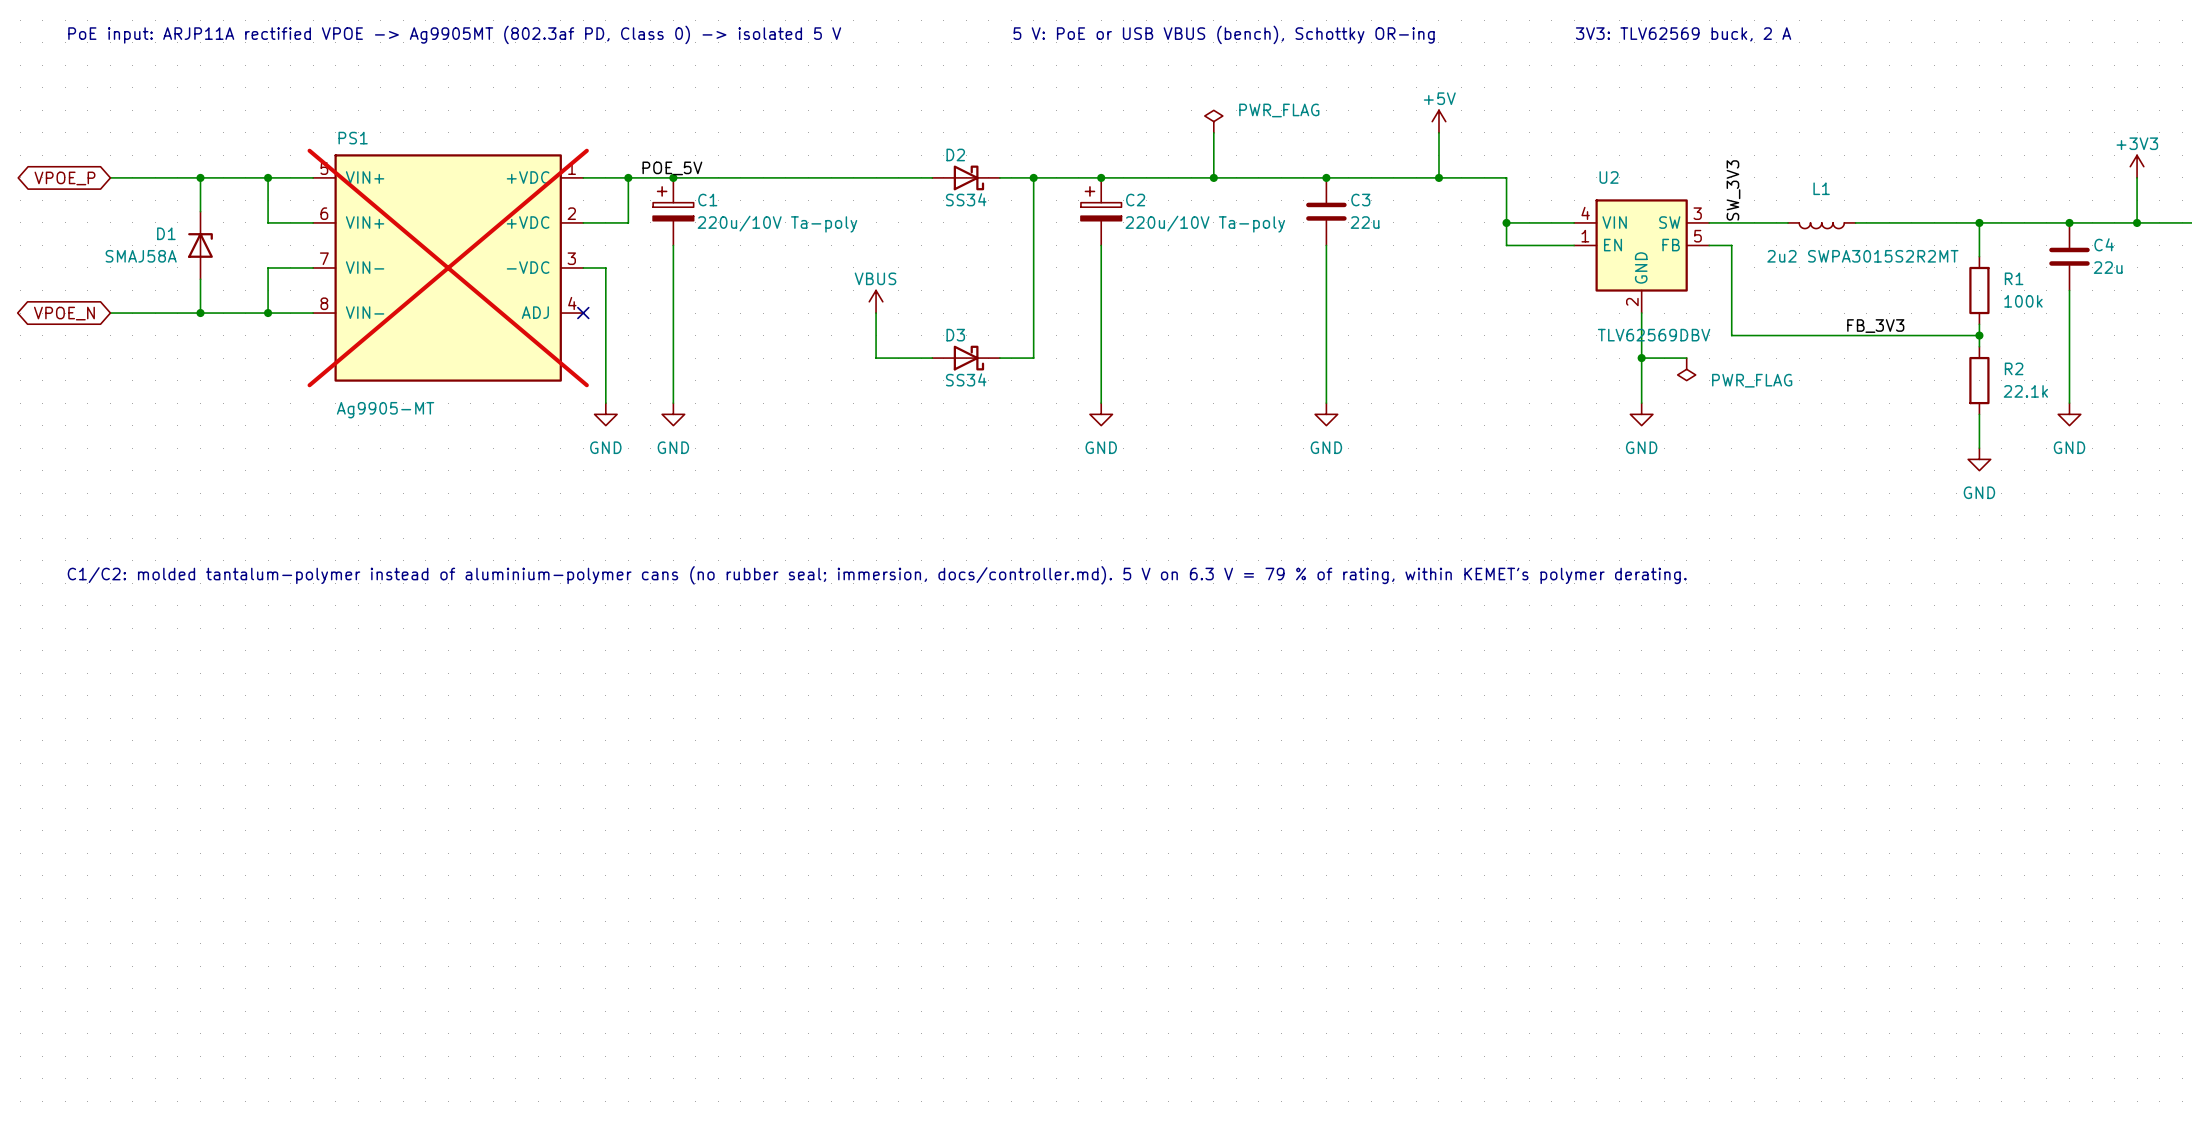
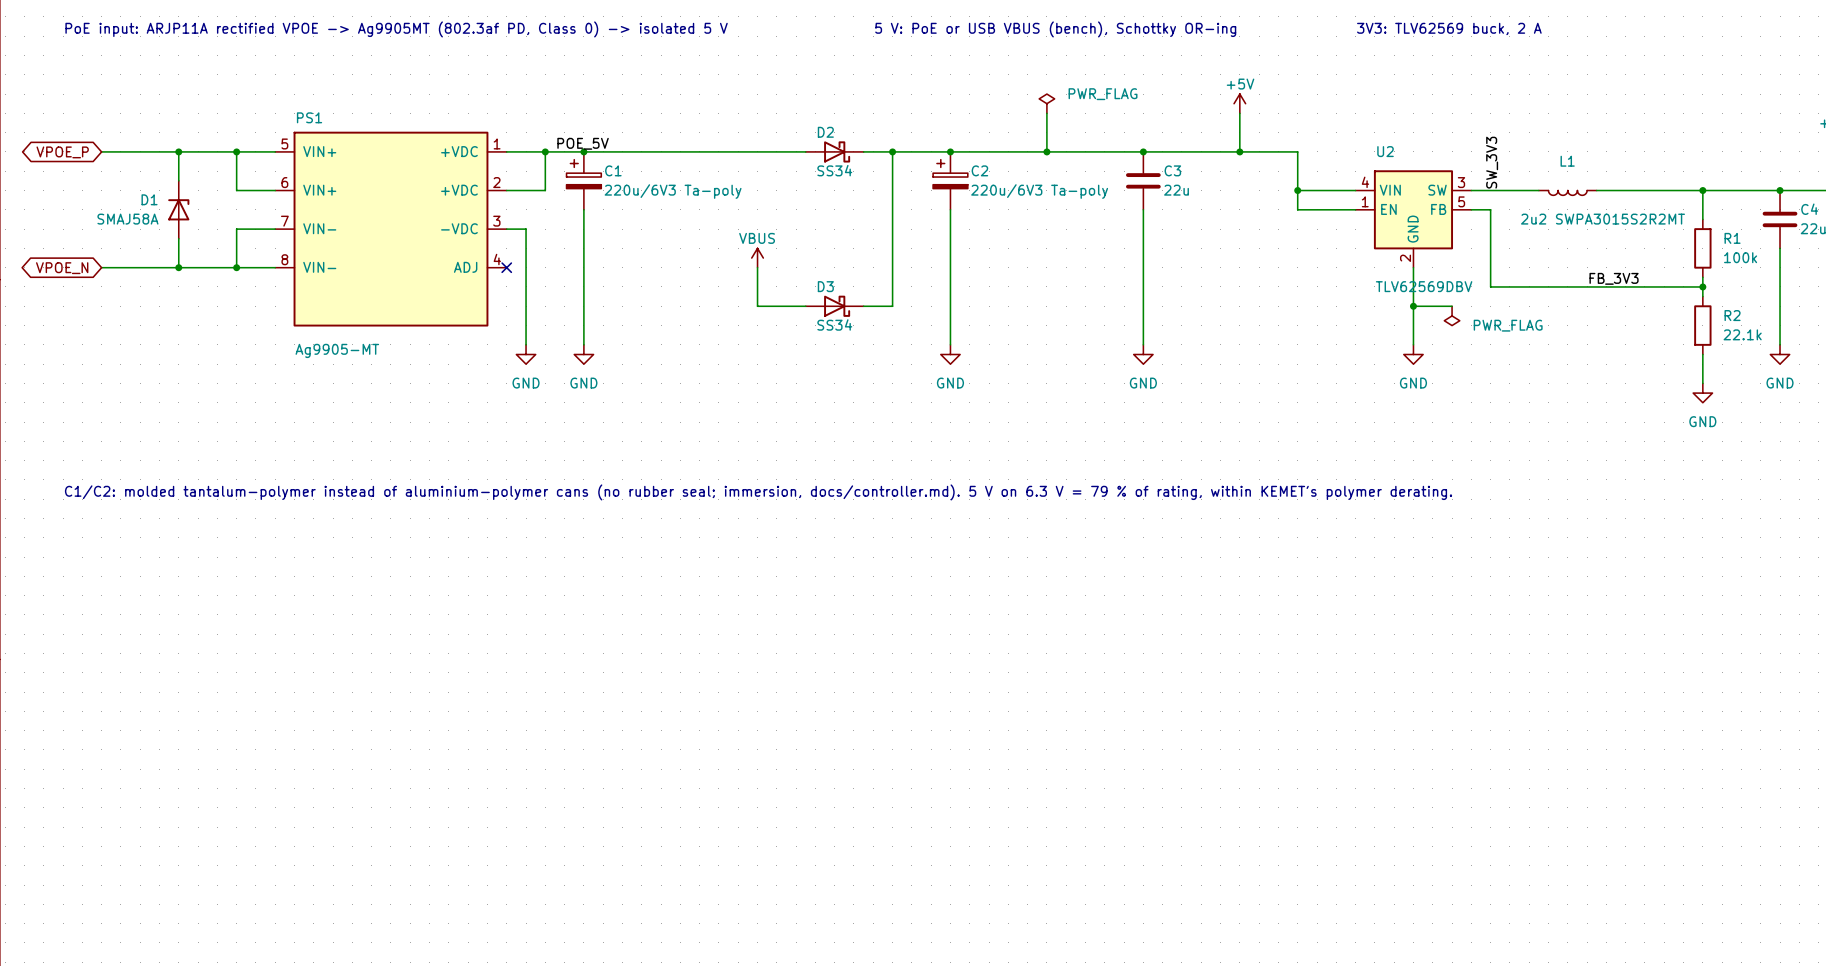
C1 value: 220u/10V Ta-poly (777, 224) -> 220u/6V3 Ta-poly (673, 191)
C2 value: 220u/10V Ta-poly (1205, 224) -> 220u/6V3 Ta-poly (1039, 191)
PS1 do-not-place cross: (448, 267) -> none

